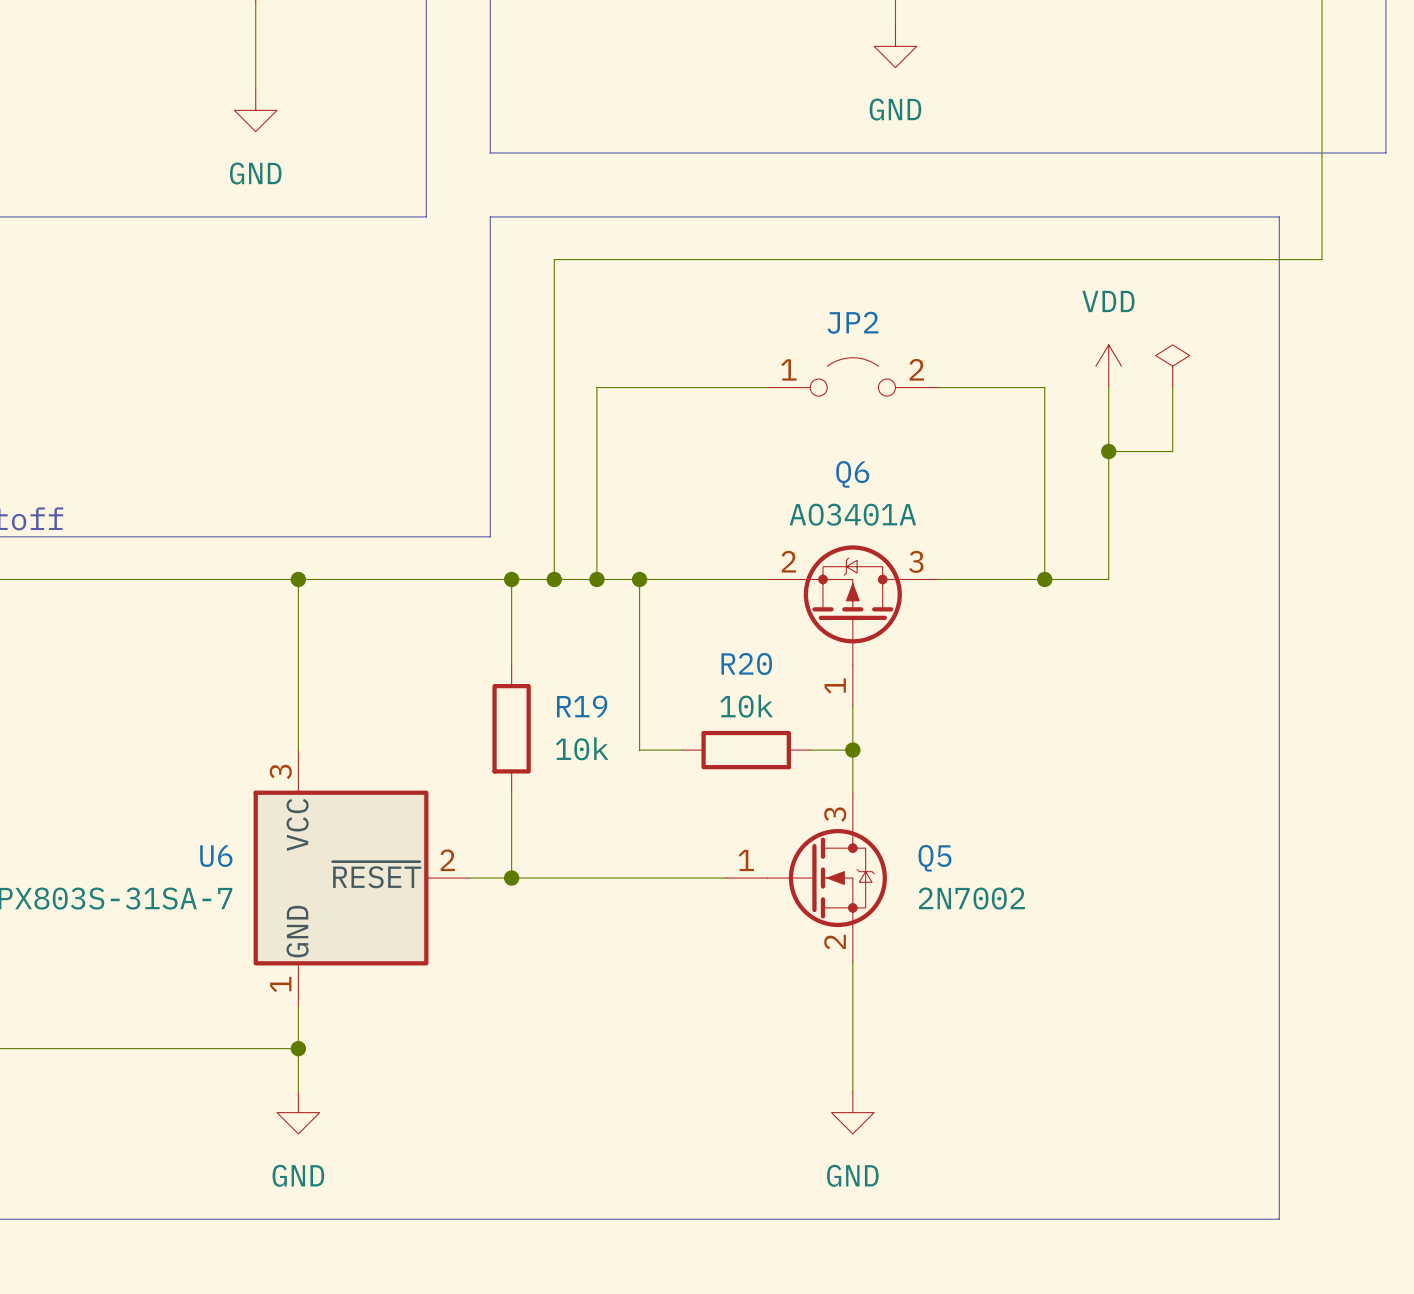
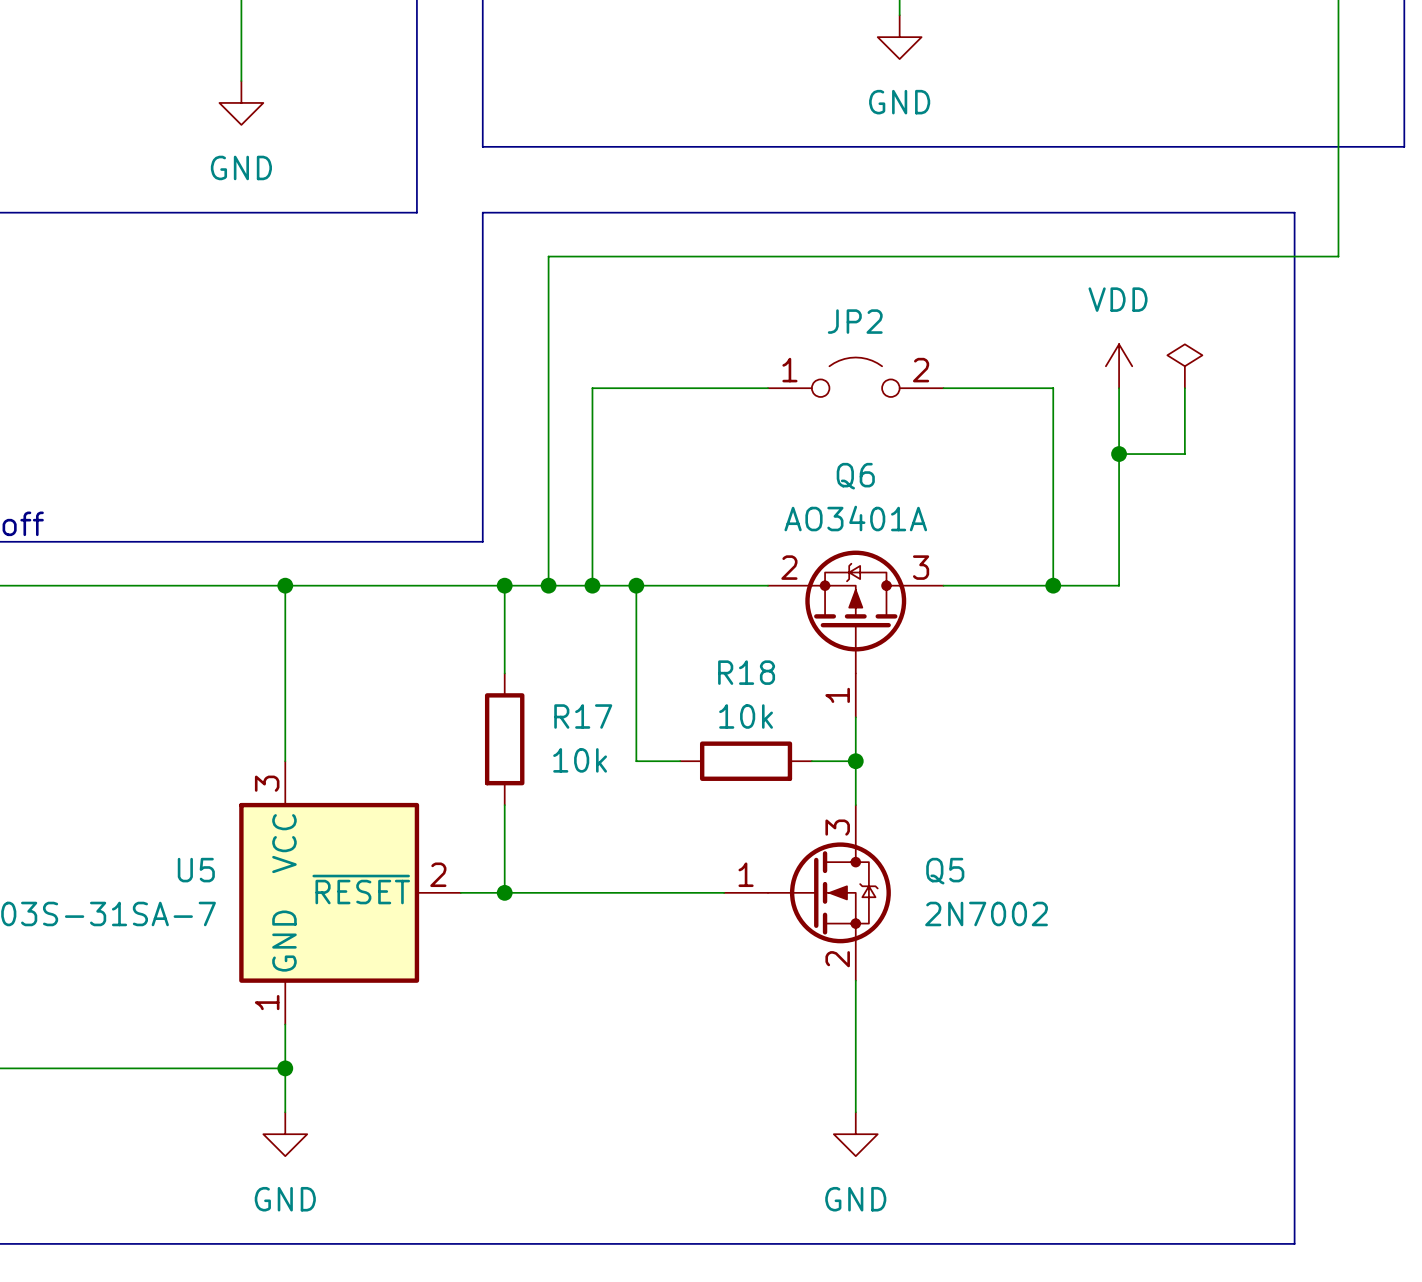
R20 name: R20 (746, 663) -> R18 (746, 672)
R19 name: R19 (582, 706) -> R17 (583, 716)
U6 name: U6 (216, 856) -> U5 (196, 870)

